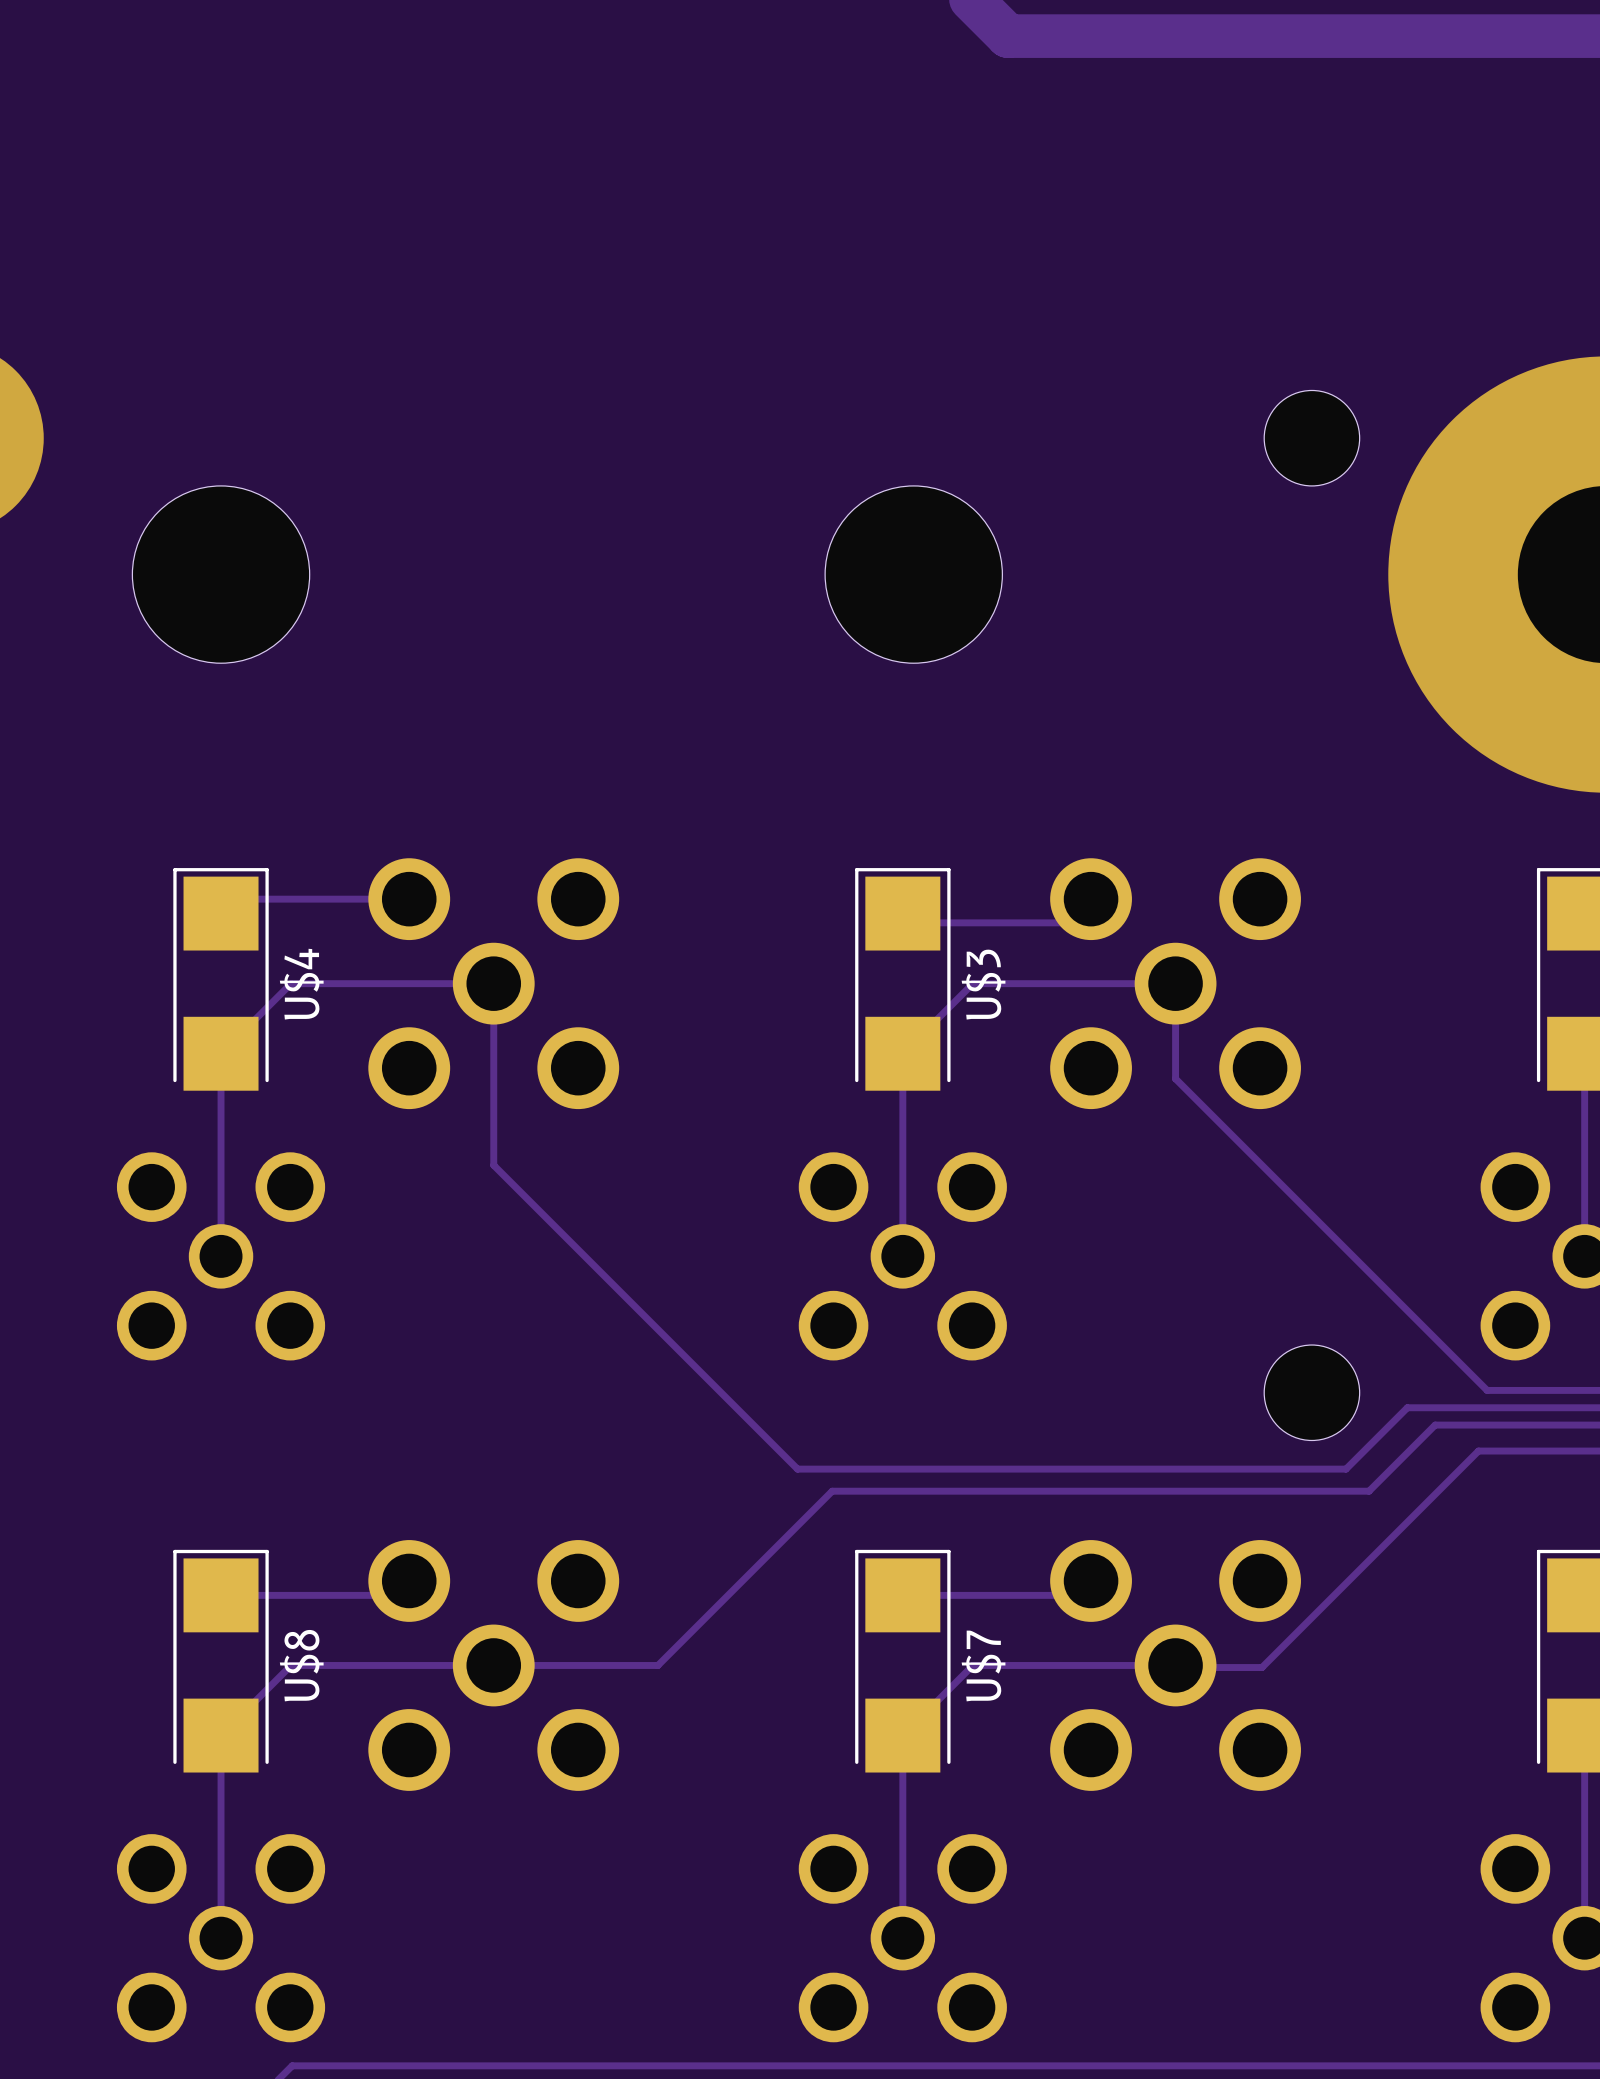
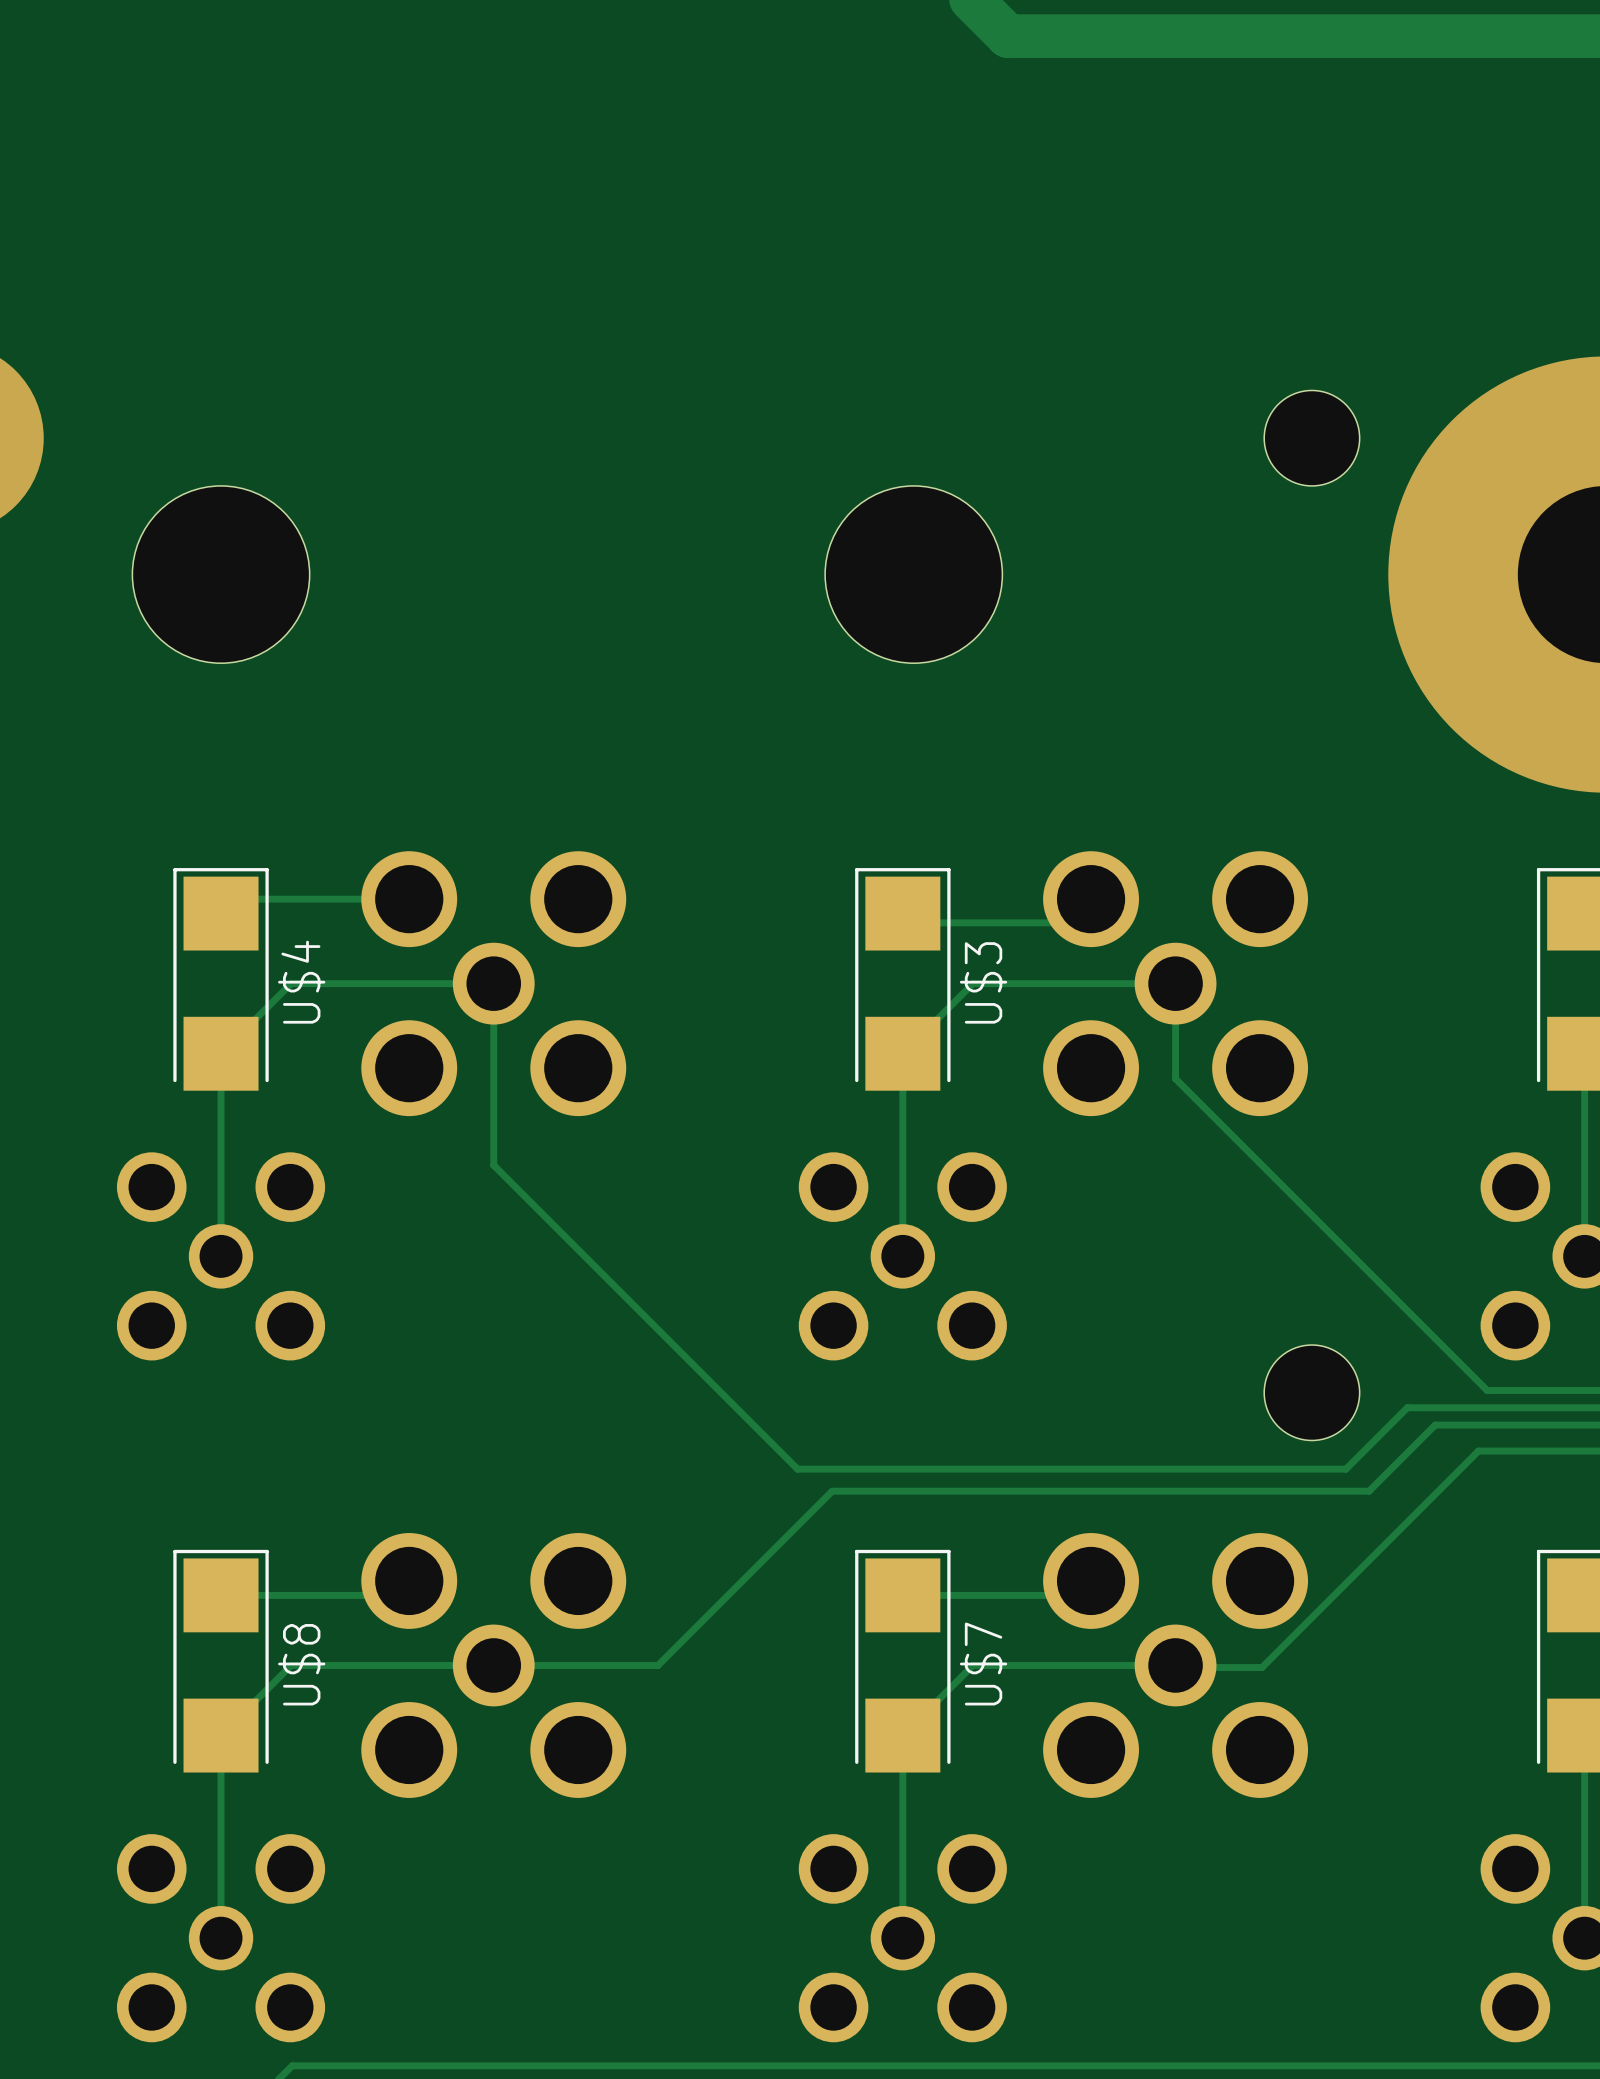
part footprint: [368, 858, 620, 1110] -> [361, 851, 627, 1117]
part footprint: [1050, 858, 1301, 1110] -> [1043, 851, 1309, 1117]
part footprint: [368, 1540, 620, 1791] -> [361, 1533, 627, 1798]
part footprint: [1050, 1540, 1301, 1791] -> [1043, 1533, 1309, 1798]

